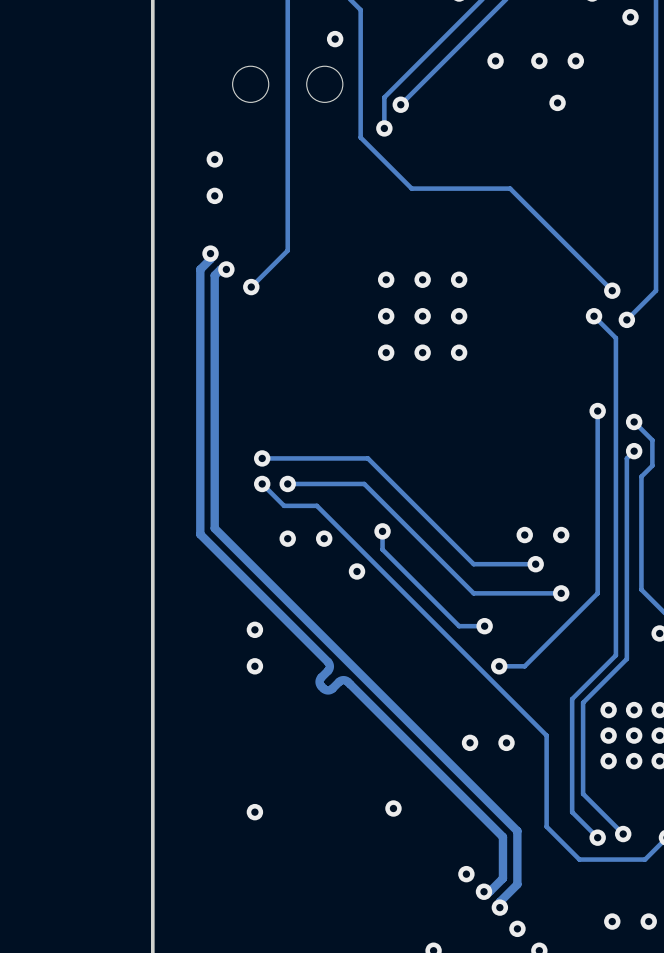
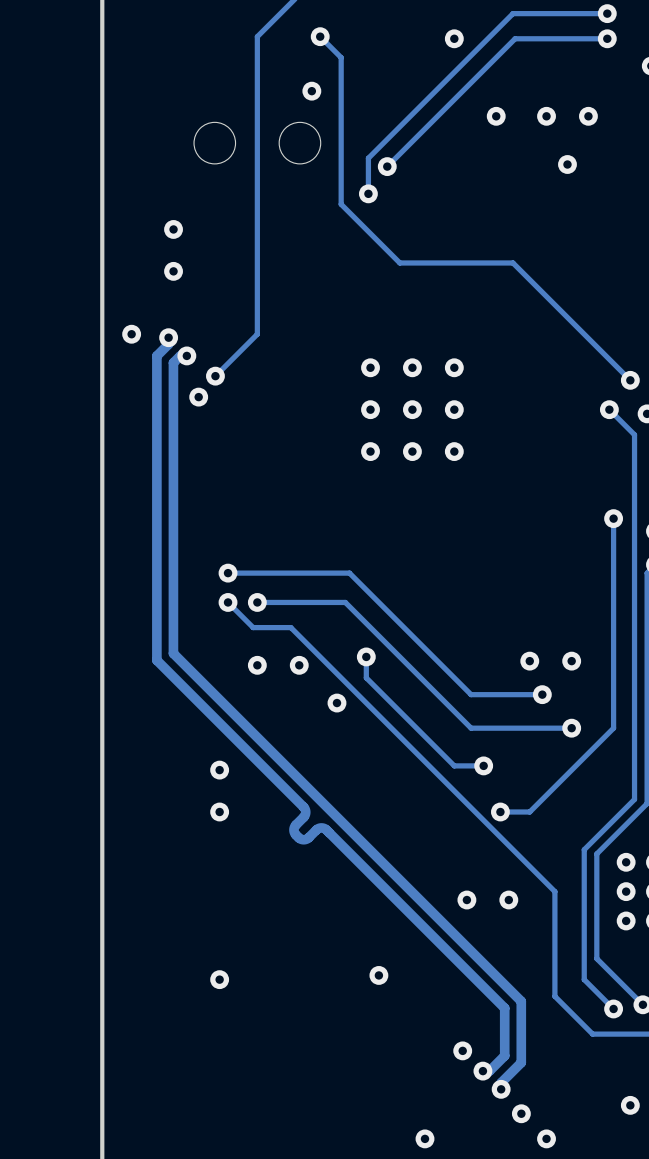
via: none -> (131, 334)
via: none -> (198, 397)

